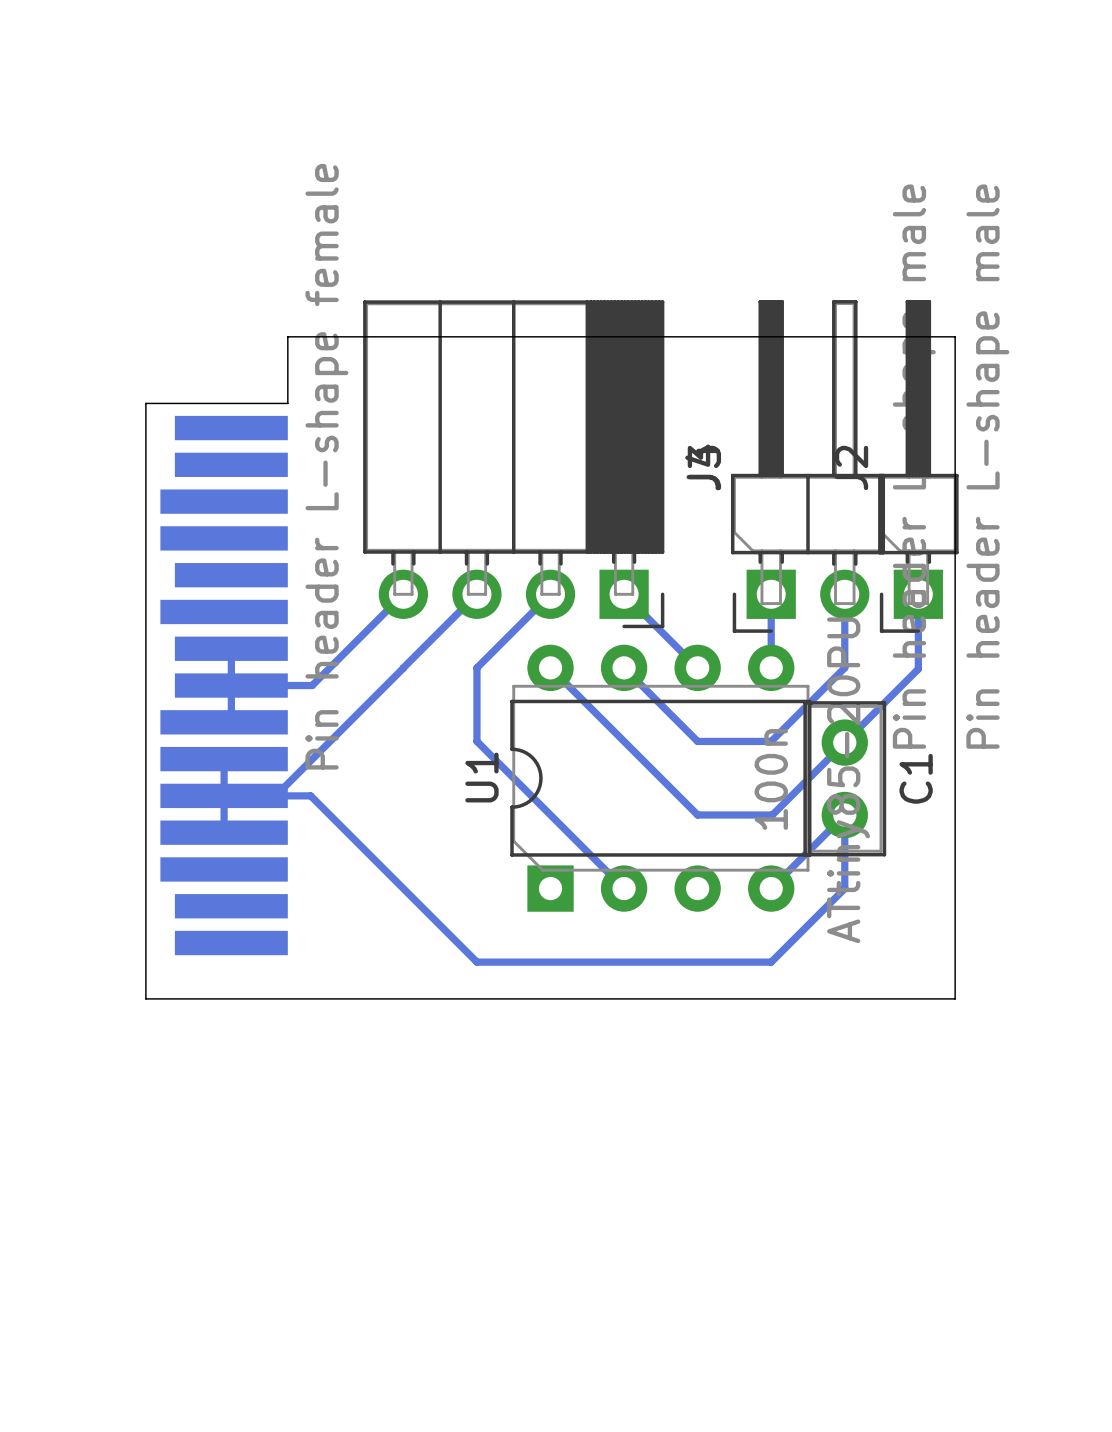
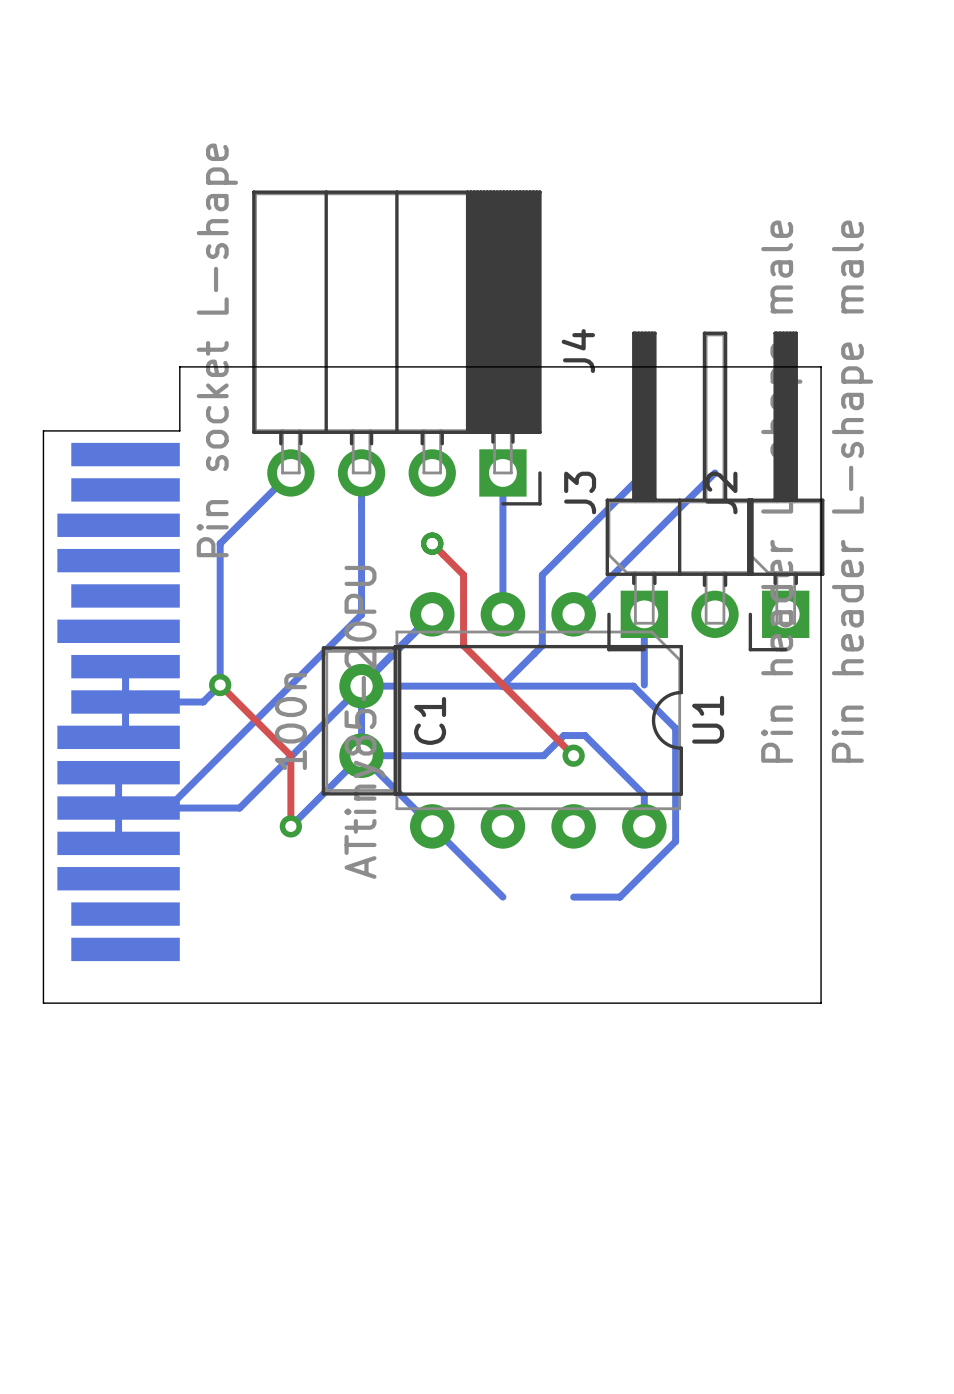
bottom track: none -> (644, 472) (542, 574) (542, 645) (501, 686)
bottom track: none -> (715, 472) (573, 614)
J4 position: (513, 464) -> (396, 347)
J4 value: Pin header L-shape female (326, 466) -> Pin socket L-shape (217, 350)
top track: none -> (432, 543) (463, 574) (463, 645) (573, 755)
via: none -> (432, 543)
bottom track: (403, 594) (329, 667) -> (290, 472) (220, 543) (220, 685)
bottom track: (476, 594) (403, 667) -> (361, 472) (361, 614) (290, 685)
bottom track: (624, 594) (697, 667) -> (502, 614) (502, 472)
bottom track: (844, 594) (844, 667) (771, 741) (697, 741) (624, 667) -> none
bottom track: (918, 594) (918, 669) (772, 815) (697, 815) (550, 667) -> none
top track: none -> (220, 685) (290, 755) (290, 826)
via: none -> (220, 685)
bottom track: none -> (361, 686) (633, 686) (675, 728) (675, 841) (619, 897) (573, 897)
via: none -> (573, 755)
U1 rotation: 0° (660, 778) -> 180° (538, 720)
C1 position: (844, 778) -> (361, 720)
bottom track: (310, 795) (476, 962) (771, 962) (844, 888) (844, 815) (771, 888) -> (201, 808) (239, 808) (432, 614)
bottom track: none -> (290, 826) (361, 755) (543, 755) (563, 735) (584, 735) (644, 794) (644, 826)
via: none -> (290, 826)

